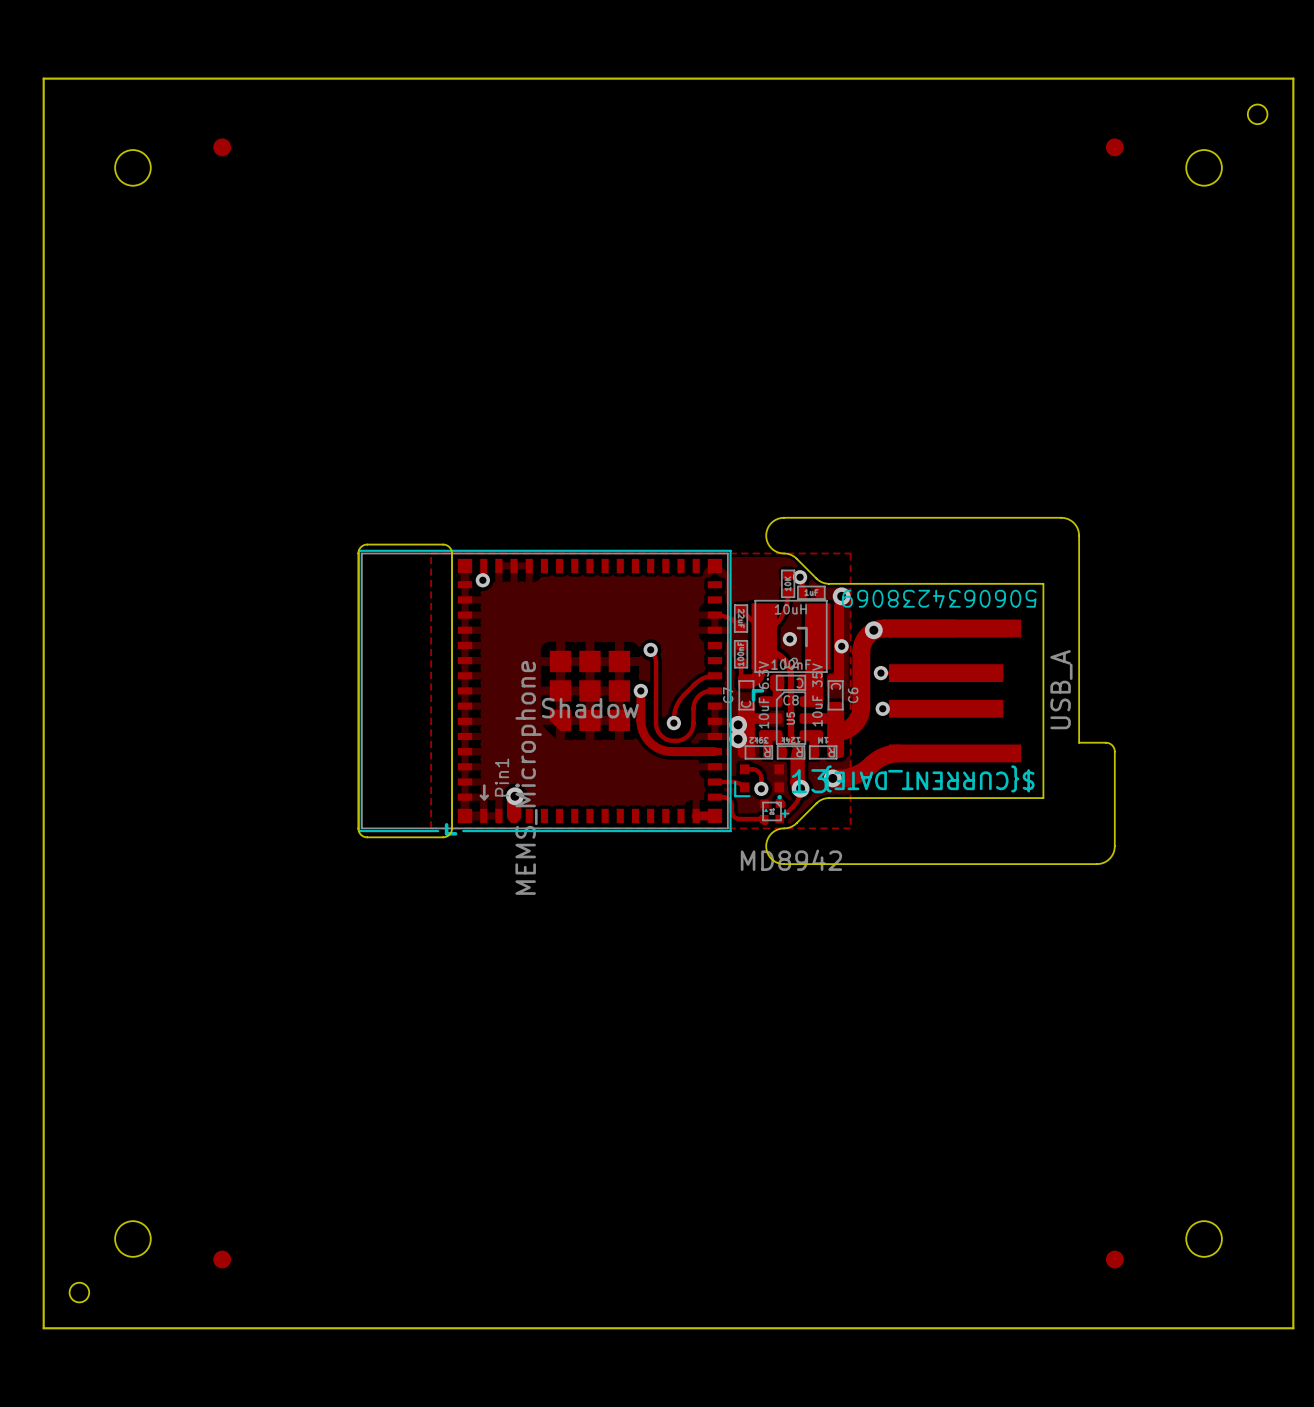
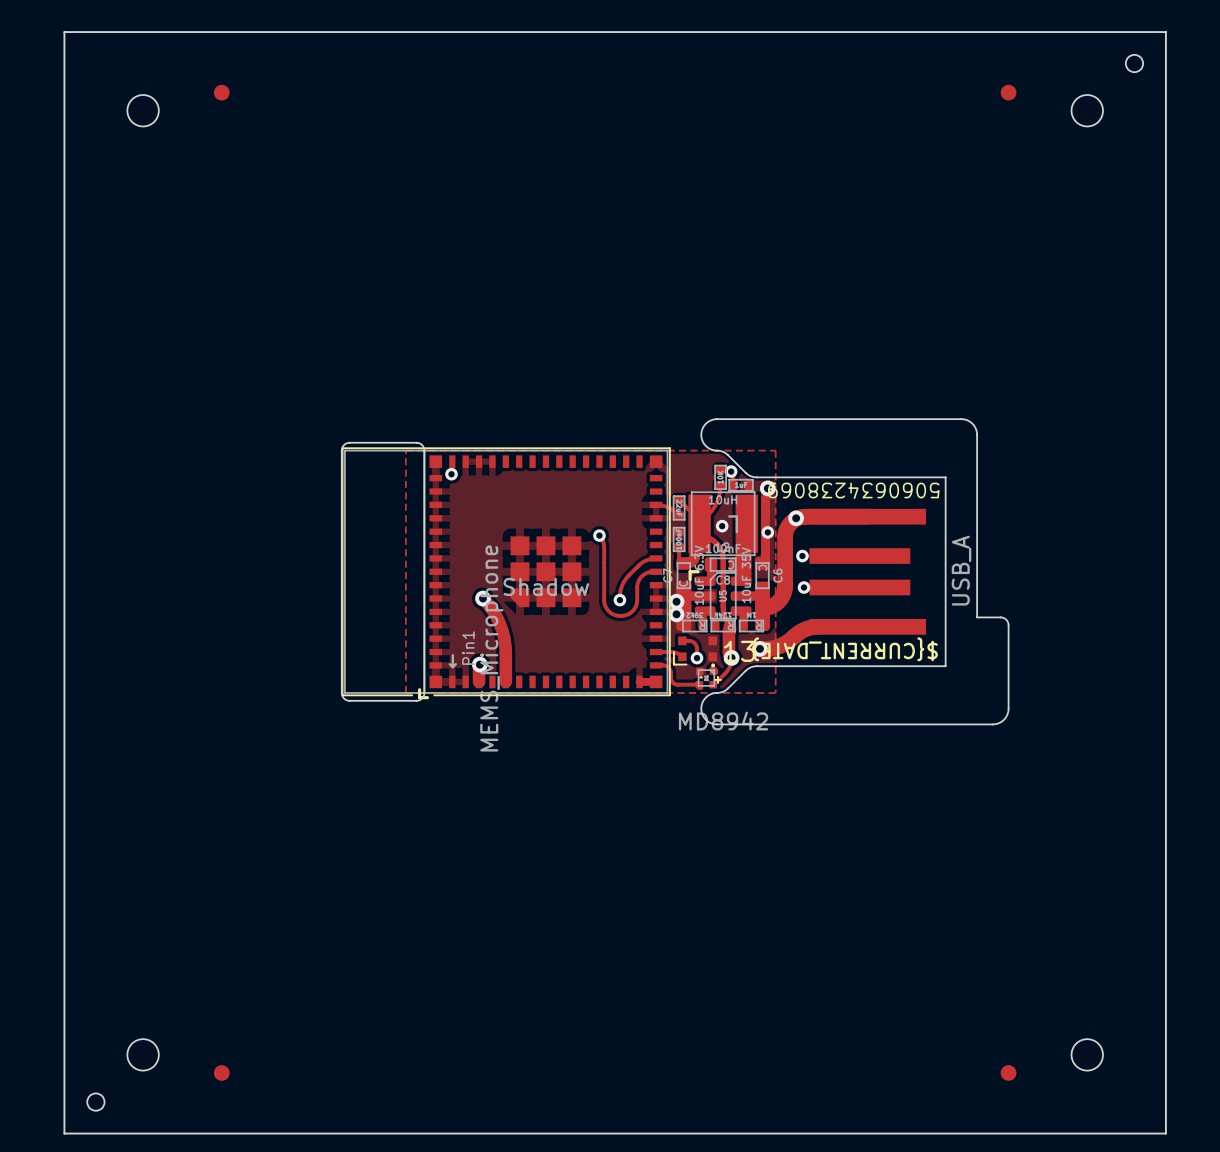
track: (640, 690) (641, 728) (647, 739) (653, 745) (668, 751) (714, 751) -> none
via: (640, 690) -> none
track: none -> (483, 598) (492, 610) (502, 631) (505, 645) (505, 681)
via: none -> (483, 598)

